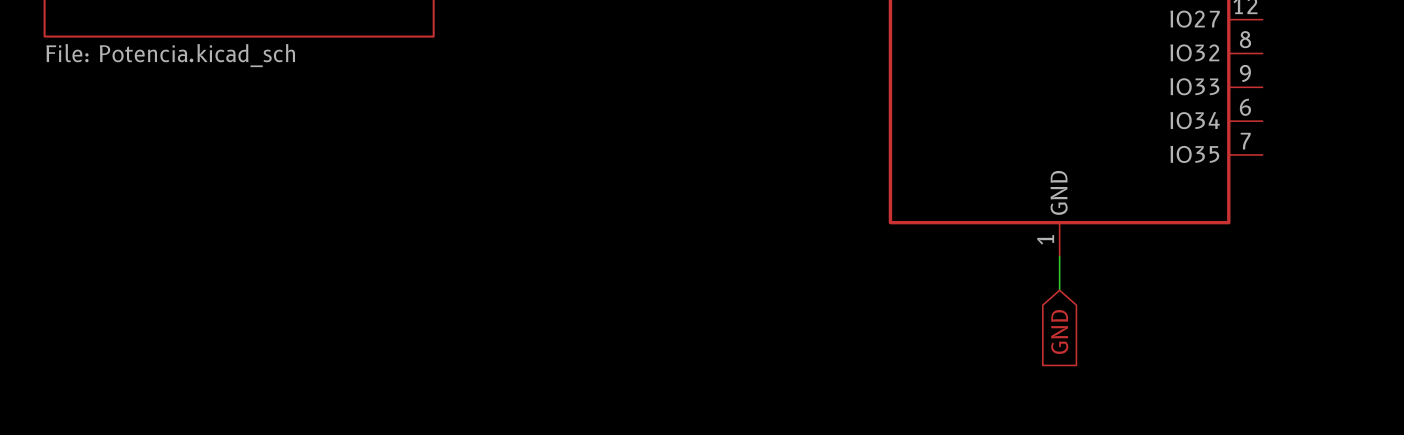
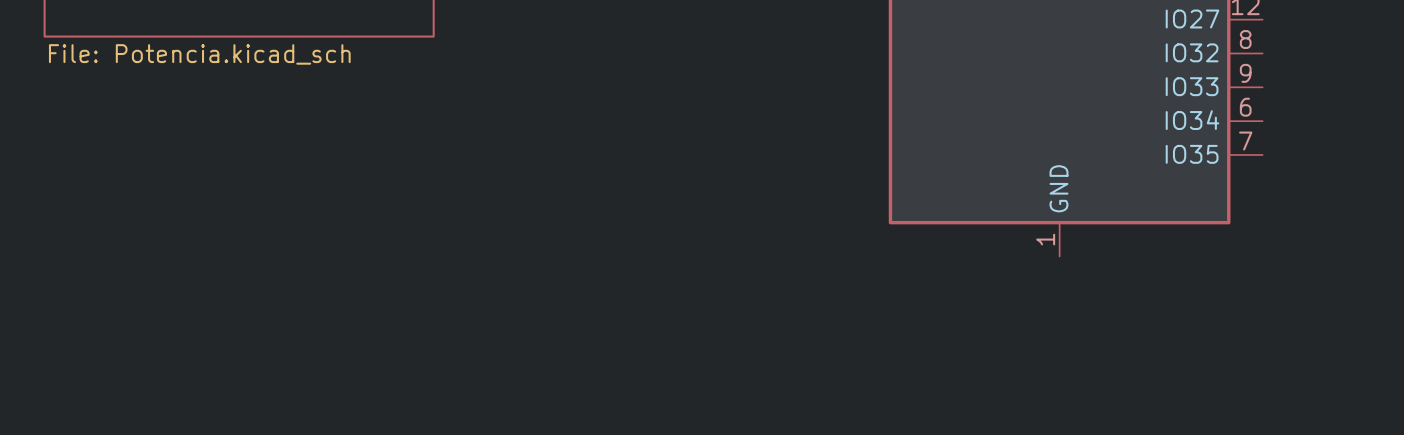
wire: (1059, 256) (1059, 290) -> none
global label: GND (1059, 332) -> none

